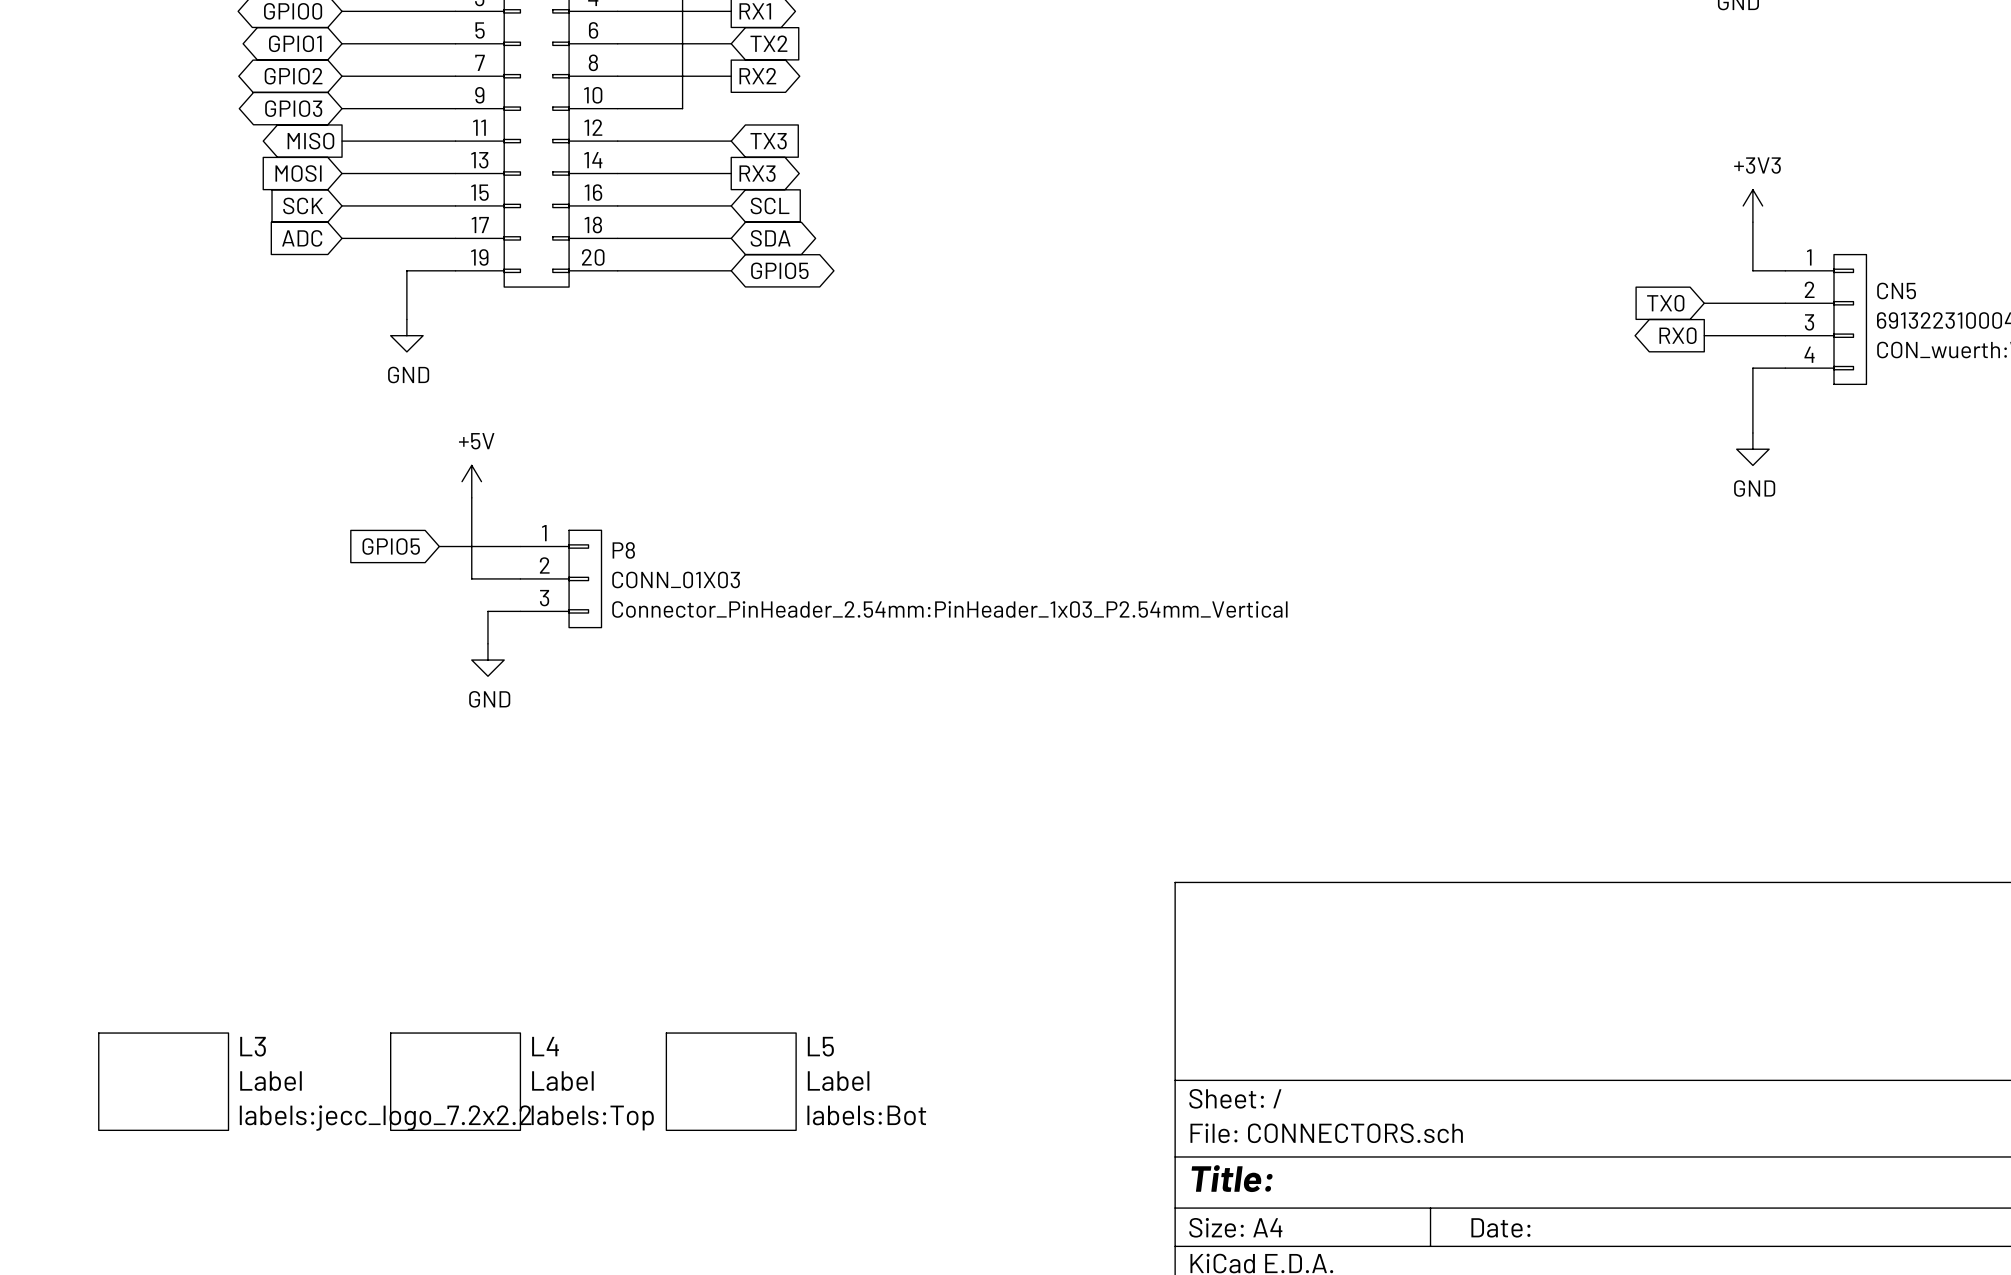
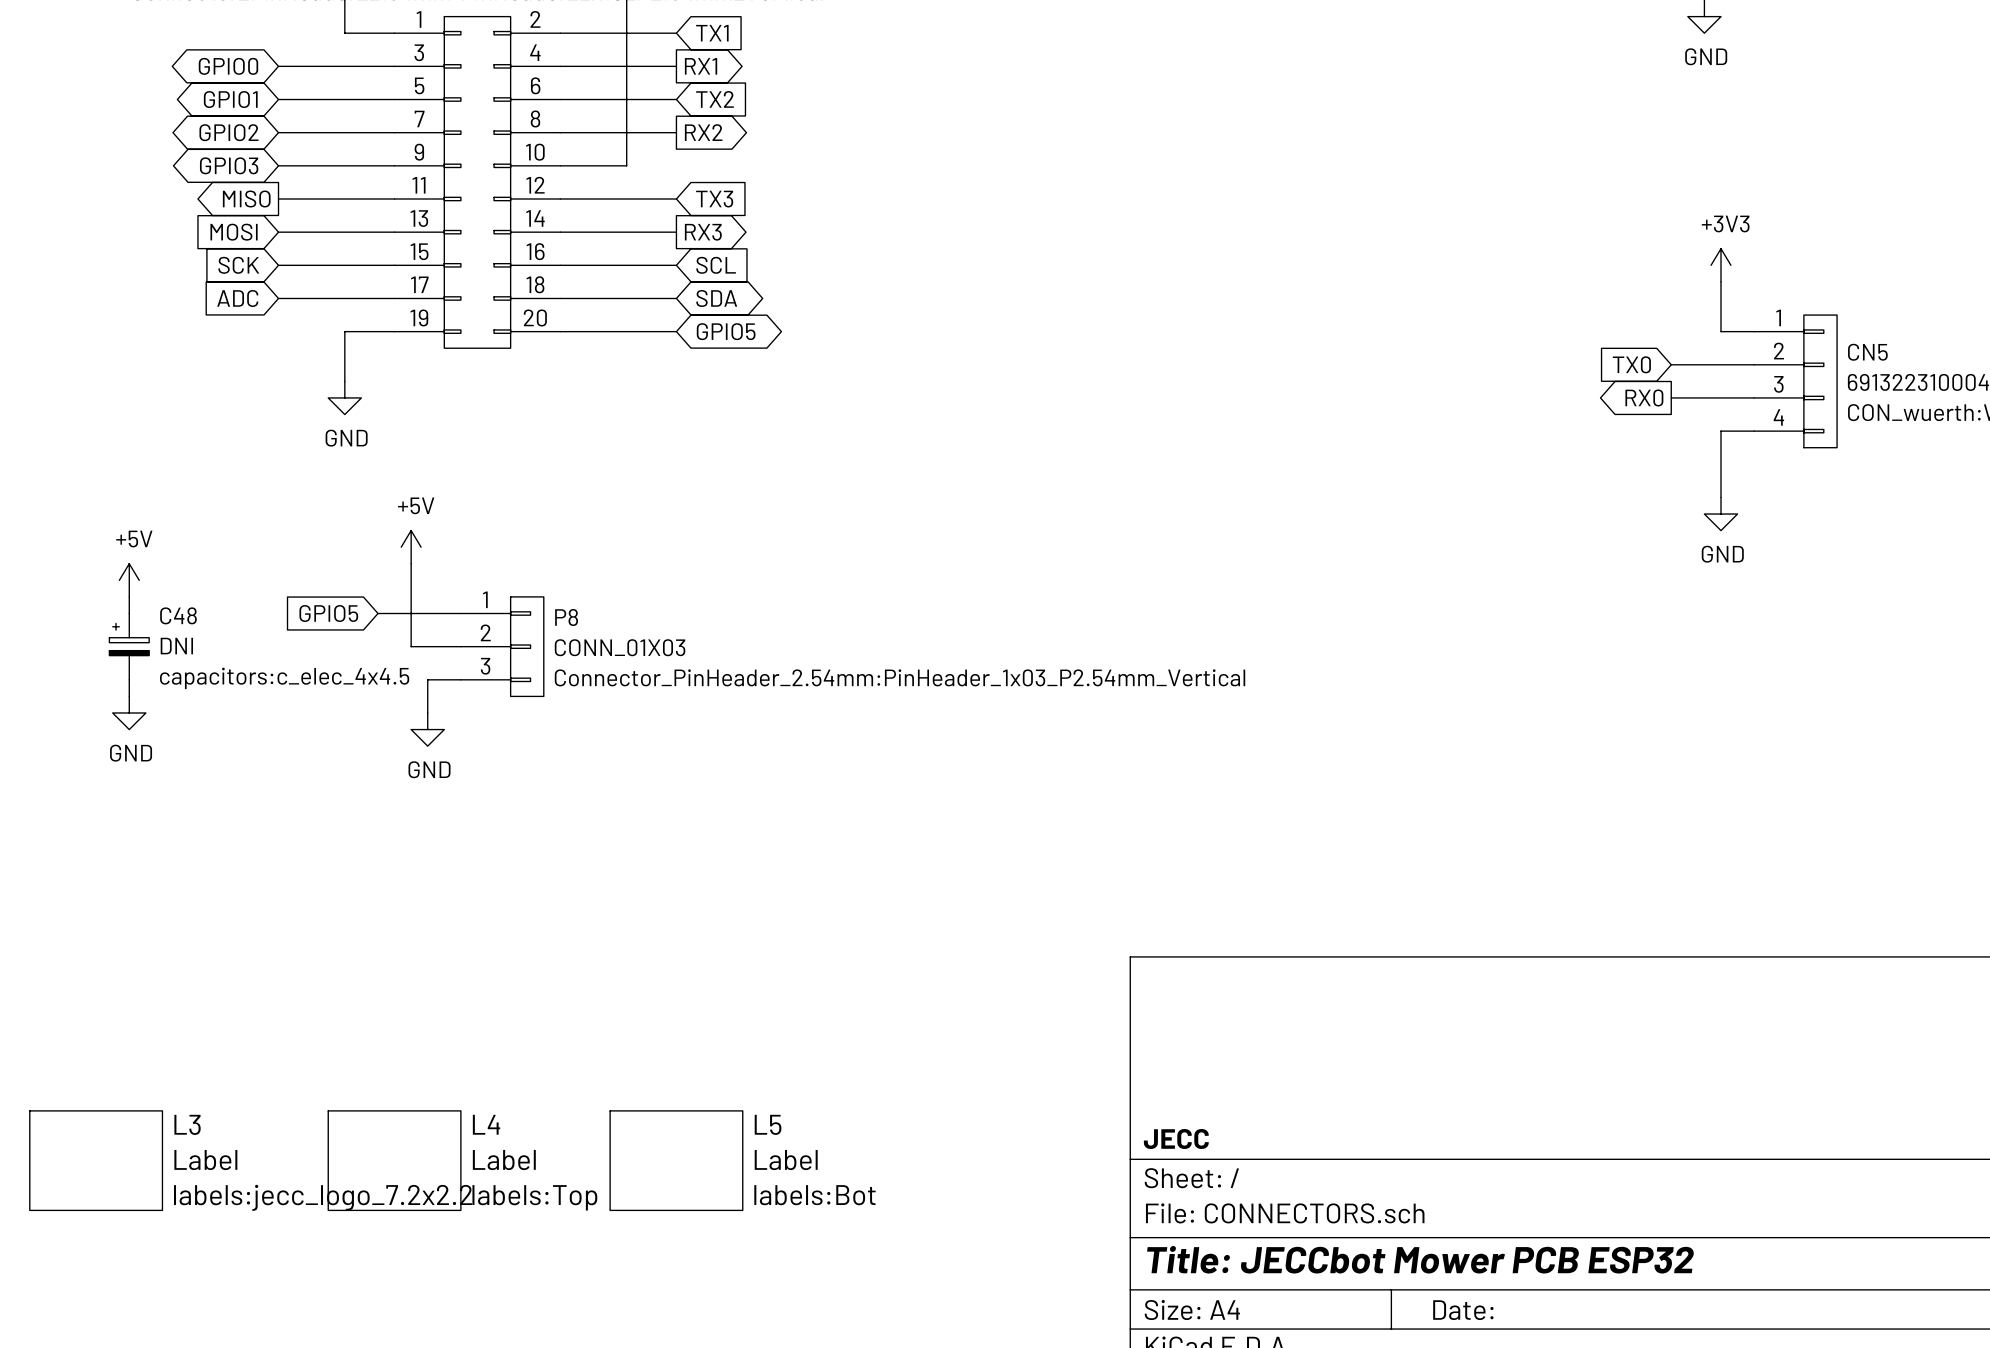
power symbol: none -> +5V (129, 580)
wire: none -> (129, 596) (129, 613)
C48: none -> DNI (129, 646)
wire: none -> (129, 679) (129, 696)
power symbol: none -> GND (129, 712)
title block: none -> JECC (1176, 1139)
title block: Title: (1232, 1178) -> Title: JECCbot Mower PCB ESP32 (1420, 1259)

